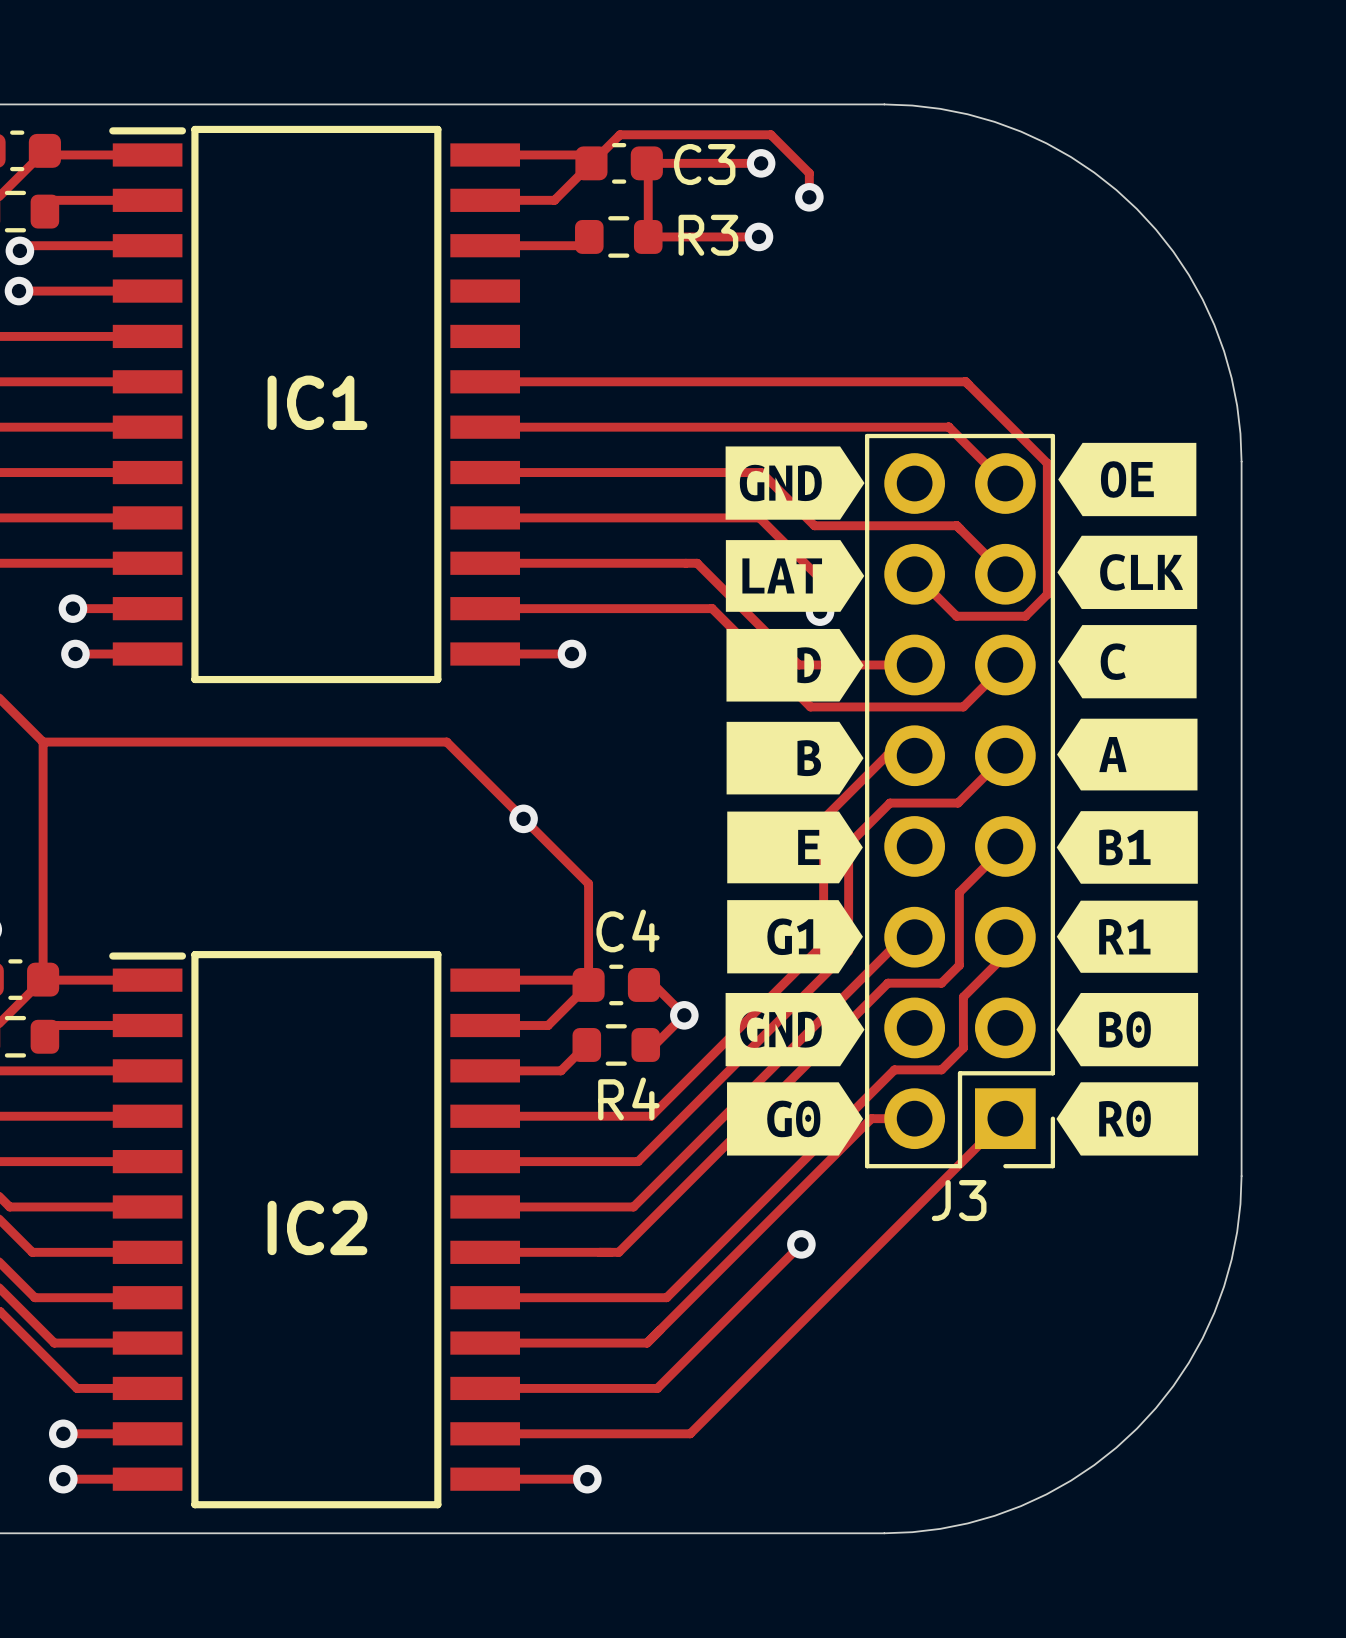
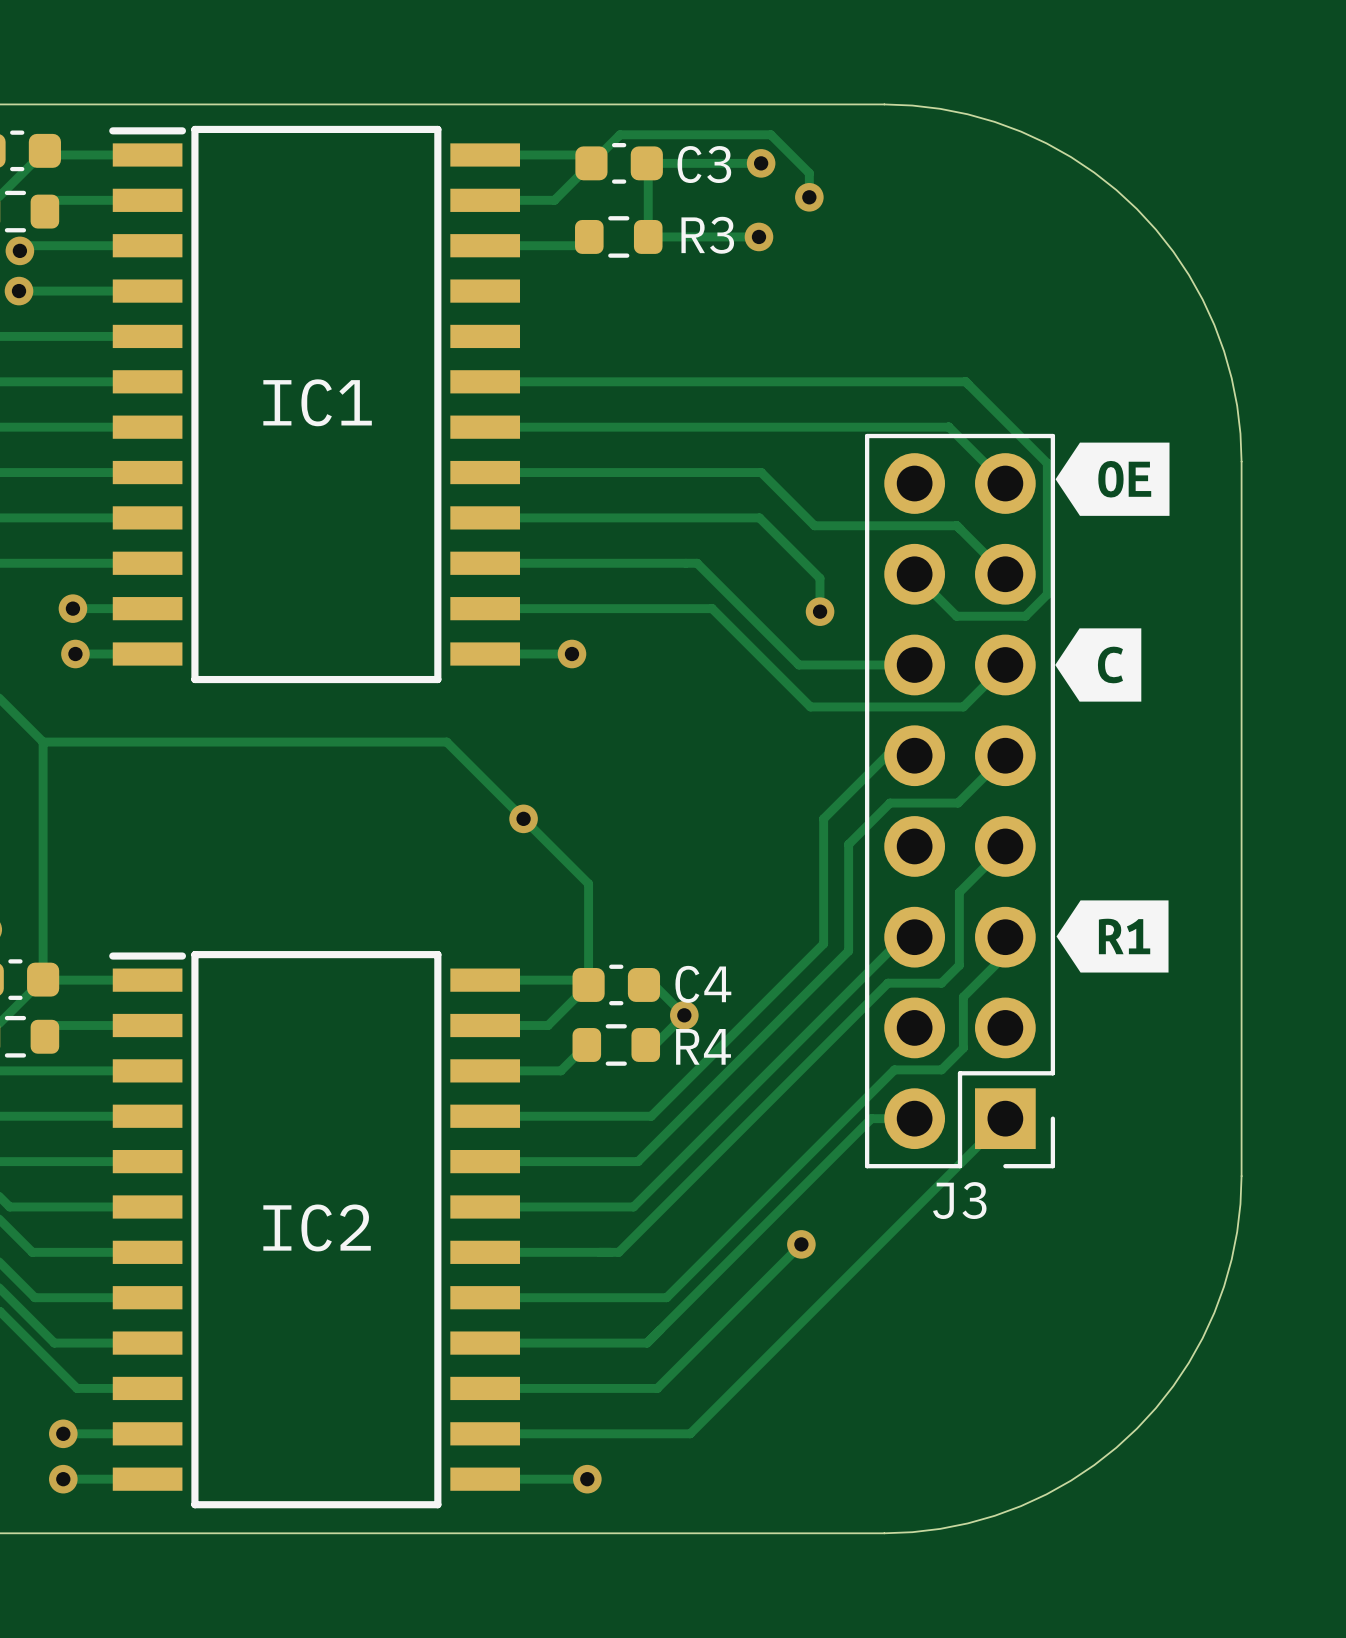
drawing shape: [1058, 442, 1197, 517] -> [1055, 442, 1170, 516]
drawing: [725, 446, 865, 1156] -> none
drawing: [1057, 535, 1198, 610] -> none
drawing shape: [1057, 625, 1197, 699] -> [1055, 628, 1142, 702]
drawing: [1056, 718, 1198, 884] -> none
drawing shape: [1056, 900, 1198, 973] -> [1056, 900, 1169, 973]
C4 name position: C4 (628, 930) -> C4 (703, 984)
drawing: [1056, 992, 1199, 1156] -> none
R4 name position: R4 (628, 1098) -> R4 (703, 1046)

